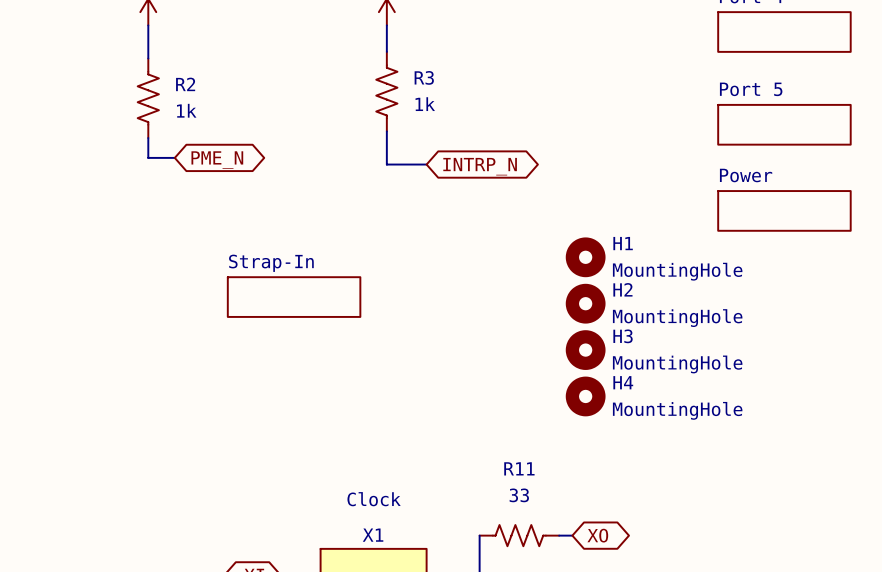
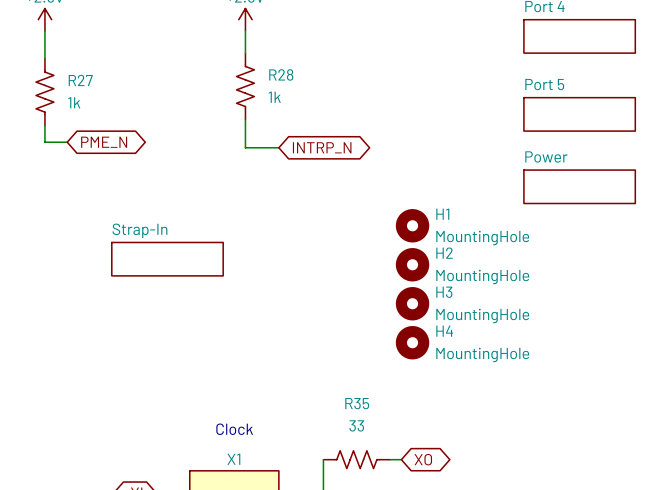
R3 name: R3 (424, 77) -> R28 (281, 74)
R2 name: R2 (185, 84) -> R27 (80, 80)
R11 name: R11 (519, 468) -> R35 (357, 403)

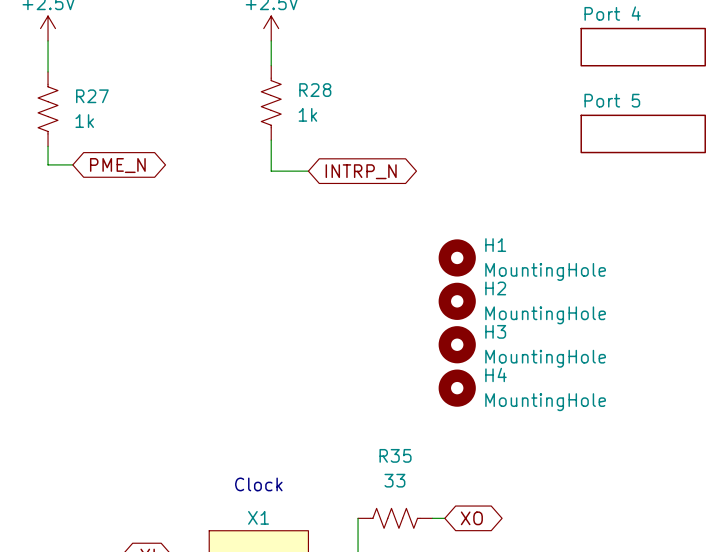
sheet Power: (579, 186) -> none
sheet Strap-In: (167, 259) -> none

